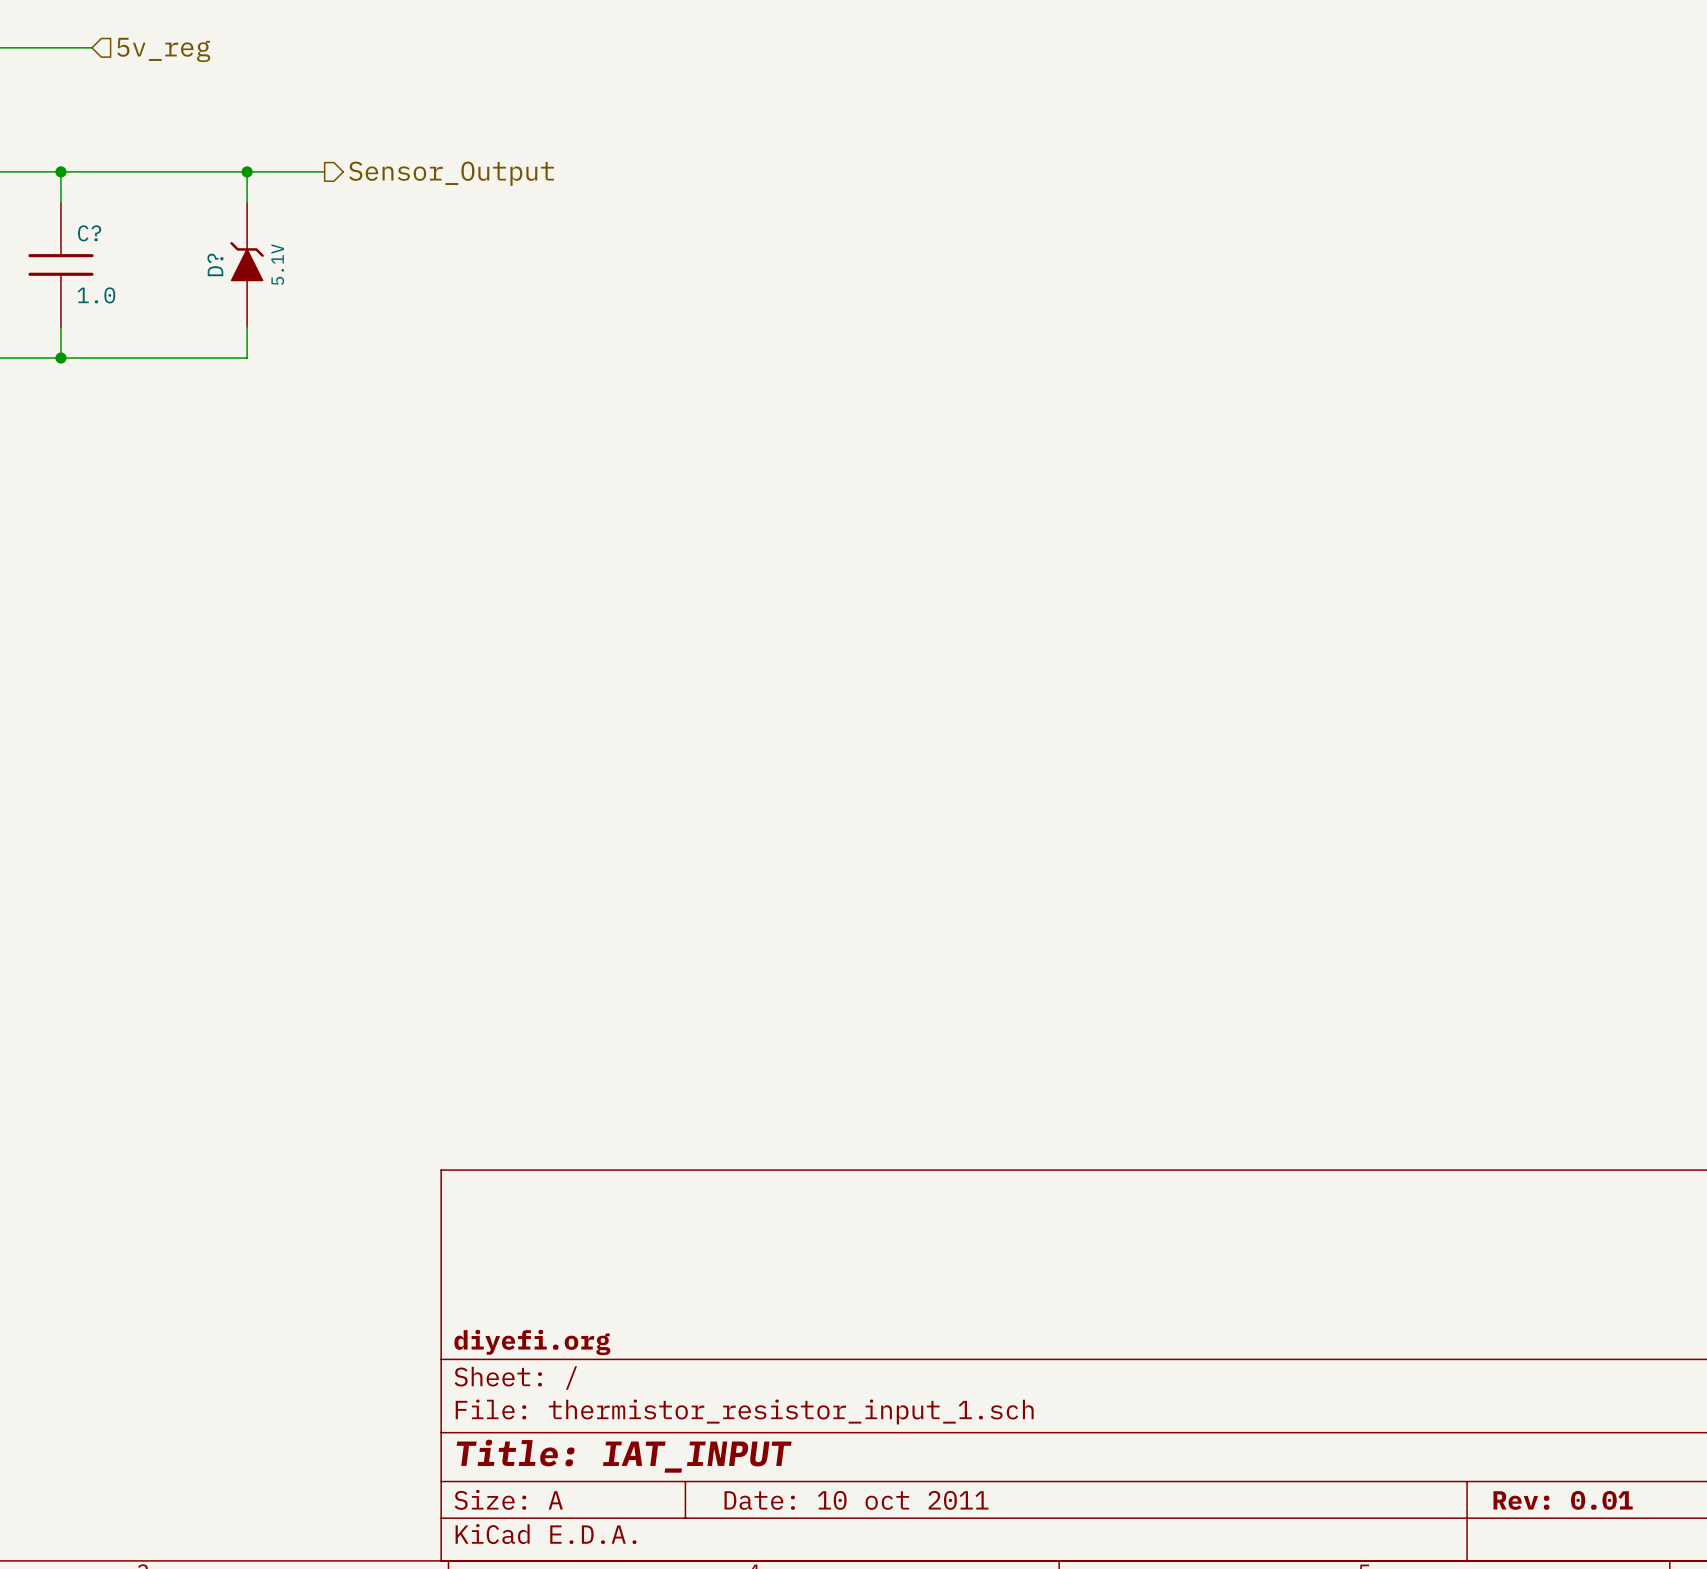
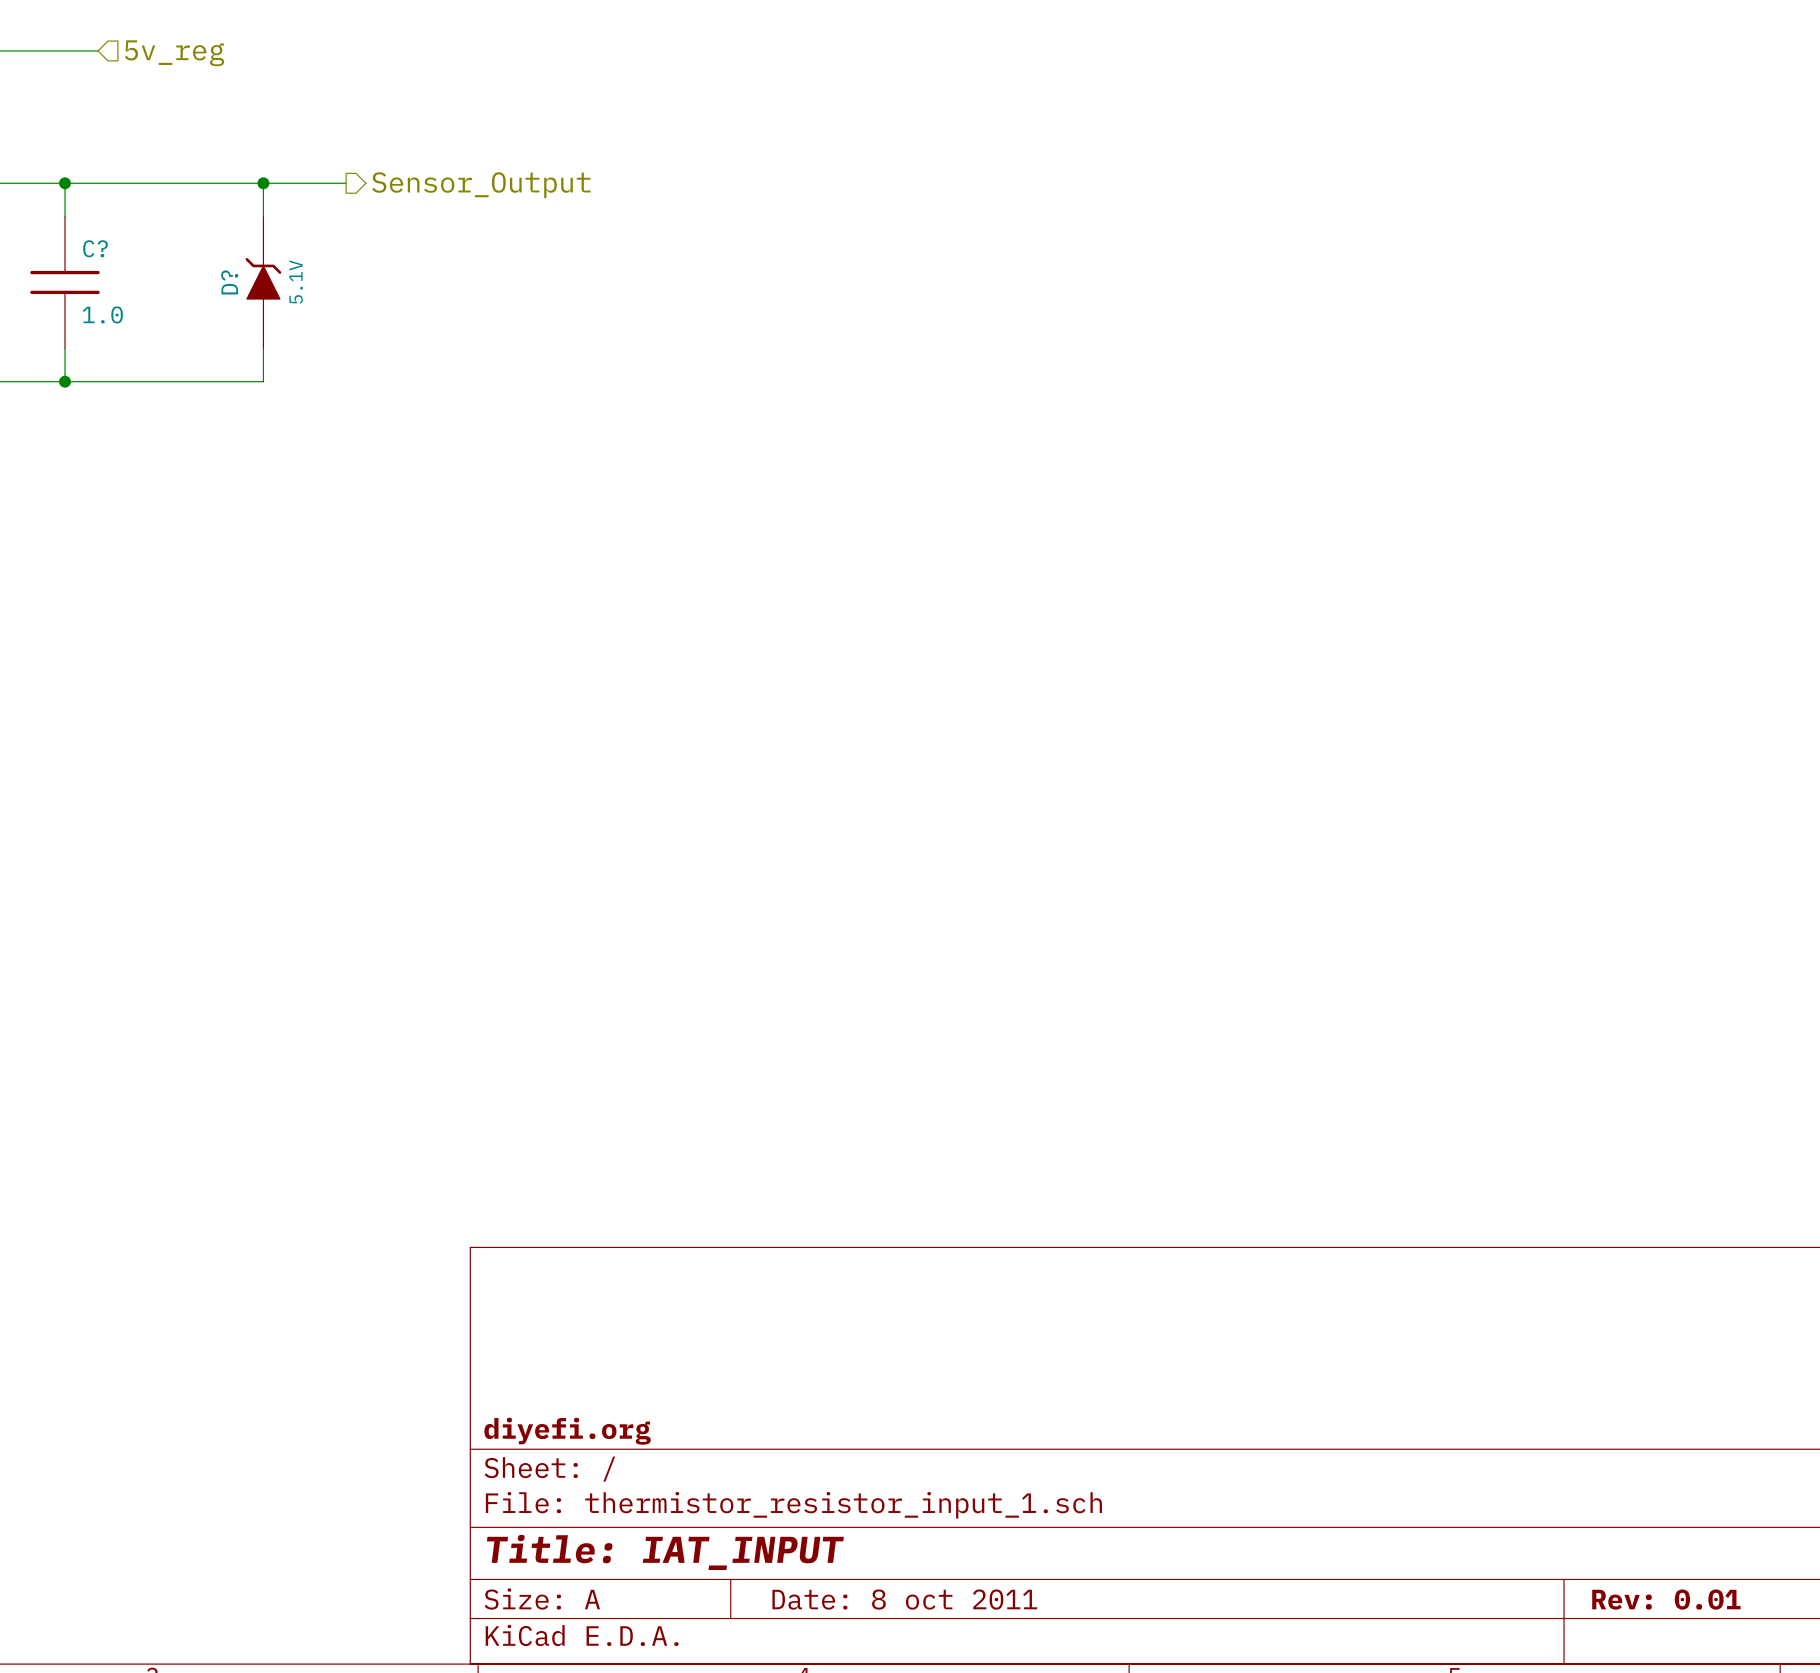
title block: Date: 10 oct 2011 (856, 1500) -> Date: 8 oct 2011 (904, 1599)

